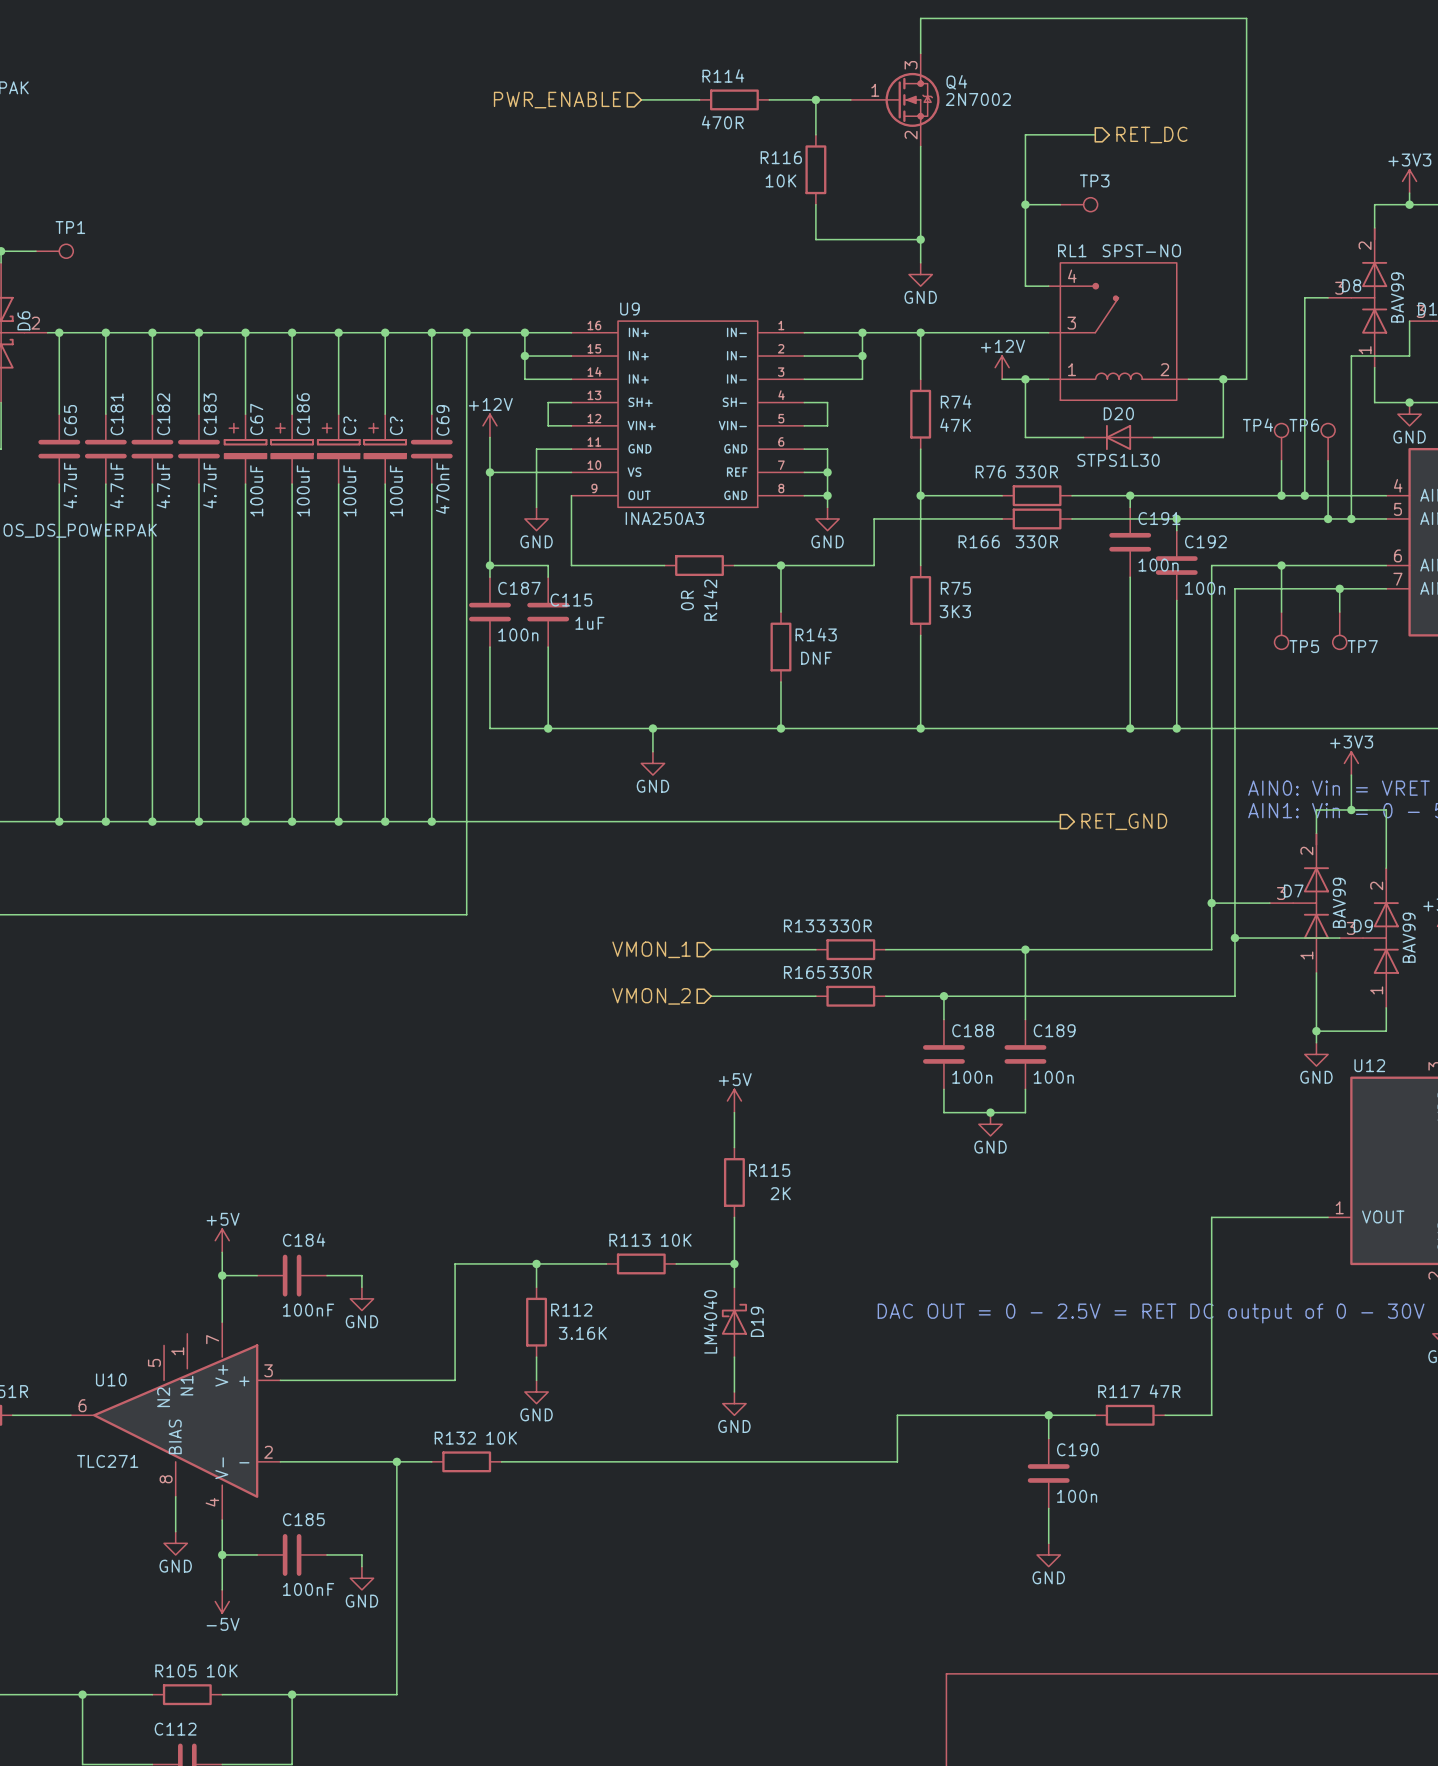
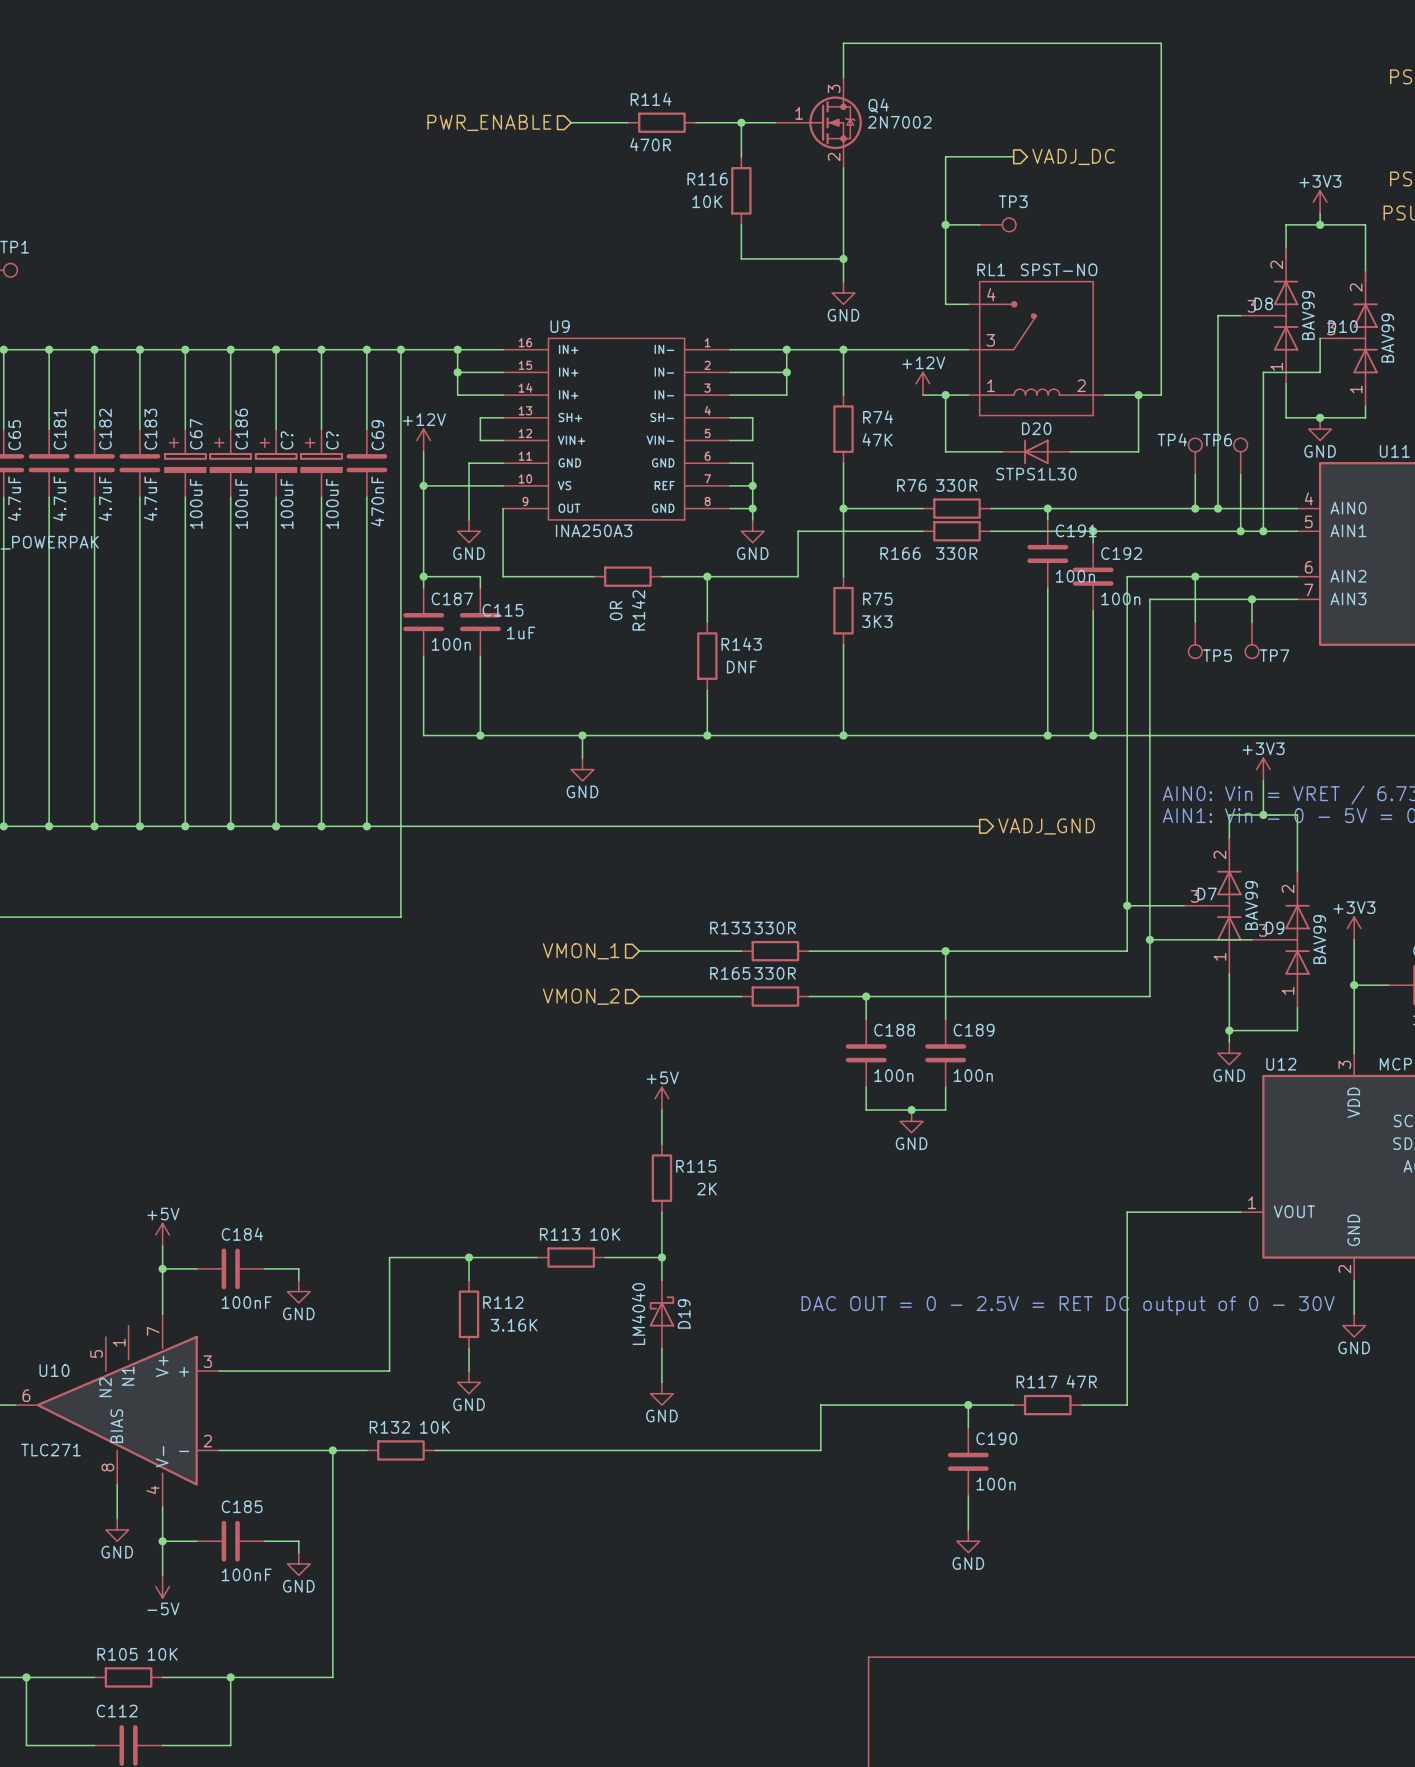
hierarchical label: RET_DC (1151, 134) -> VADJ_DC (1073, 156)
hierarchical label: RET_GND (1124, 821) -> VADJ_GND (1046, 826)

